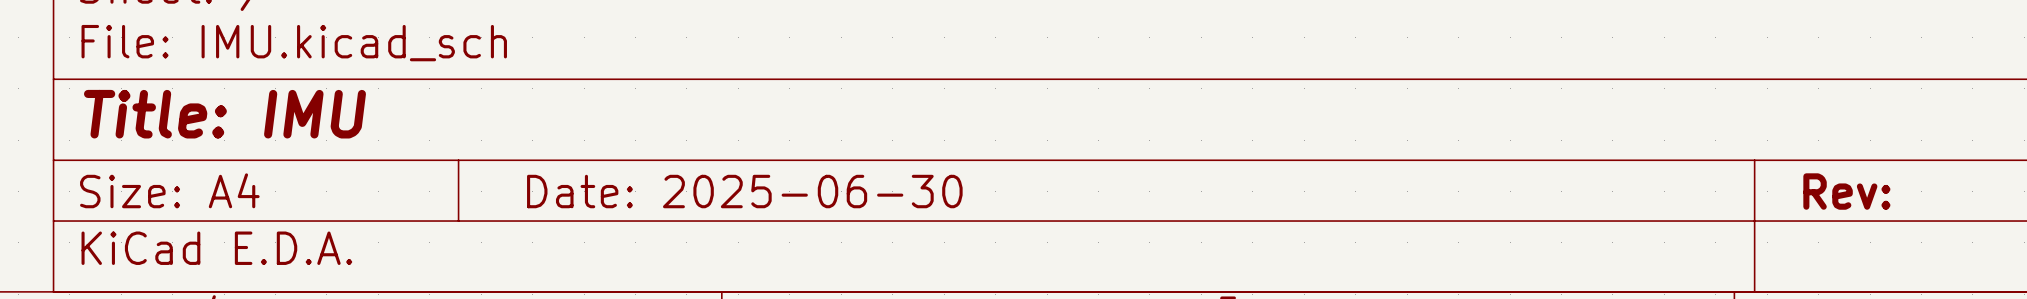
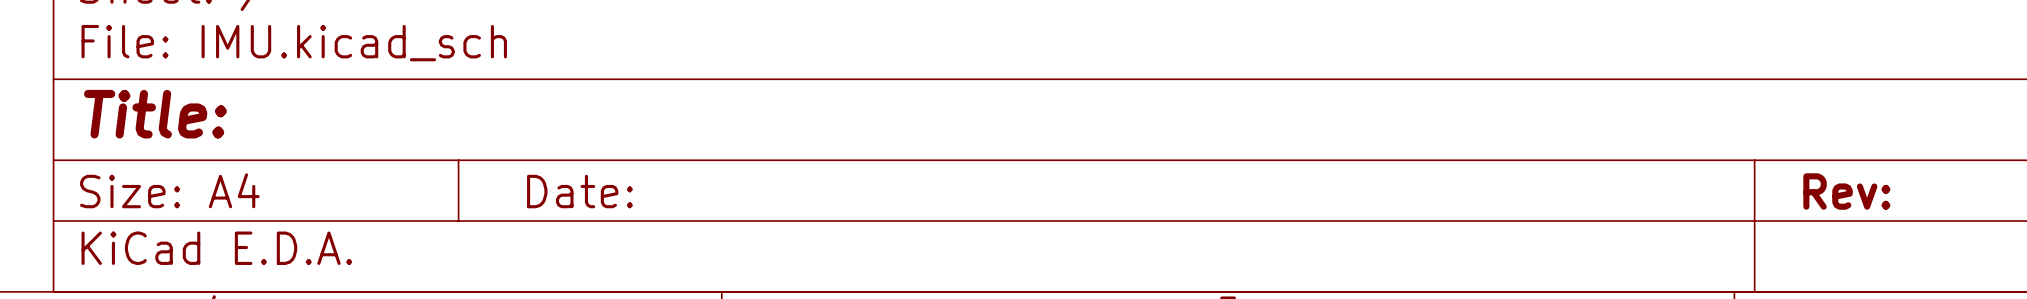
title block: Title: IMU (224, 114) -> Title: (155, 114)
title block: Date: 2025-06-30 (744, 191) -> Date: (579, 191)

